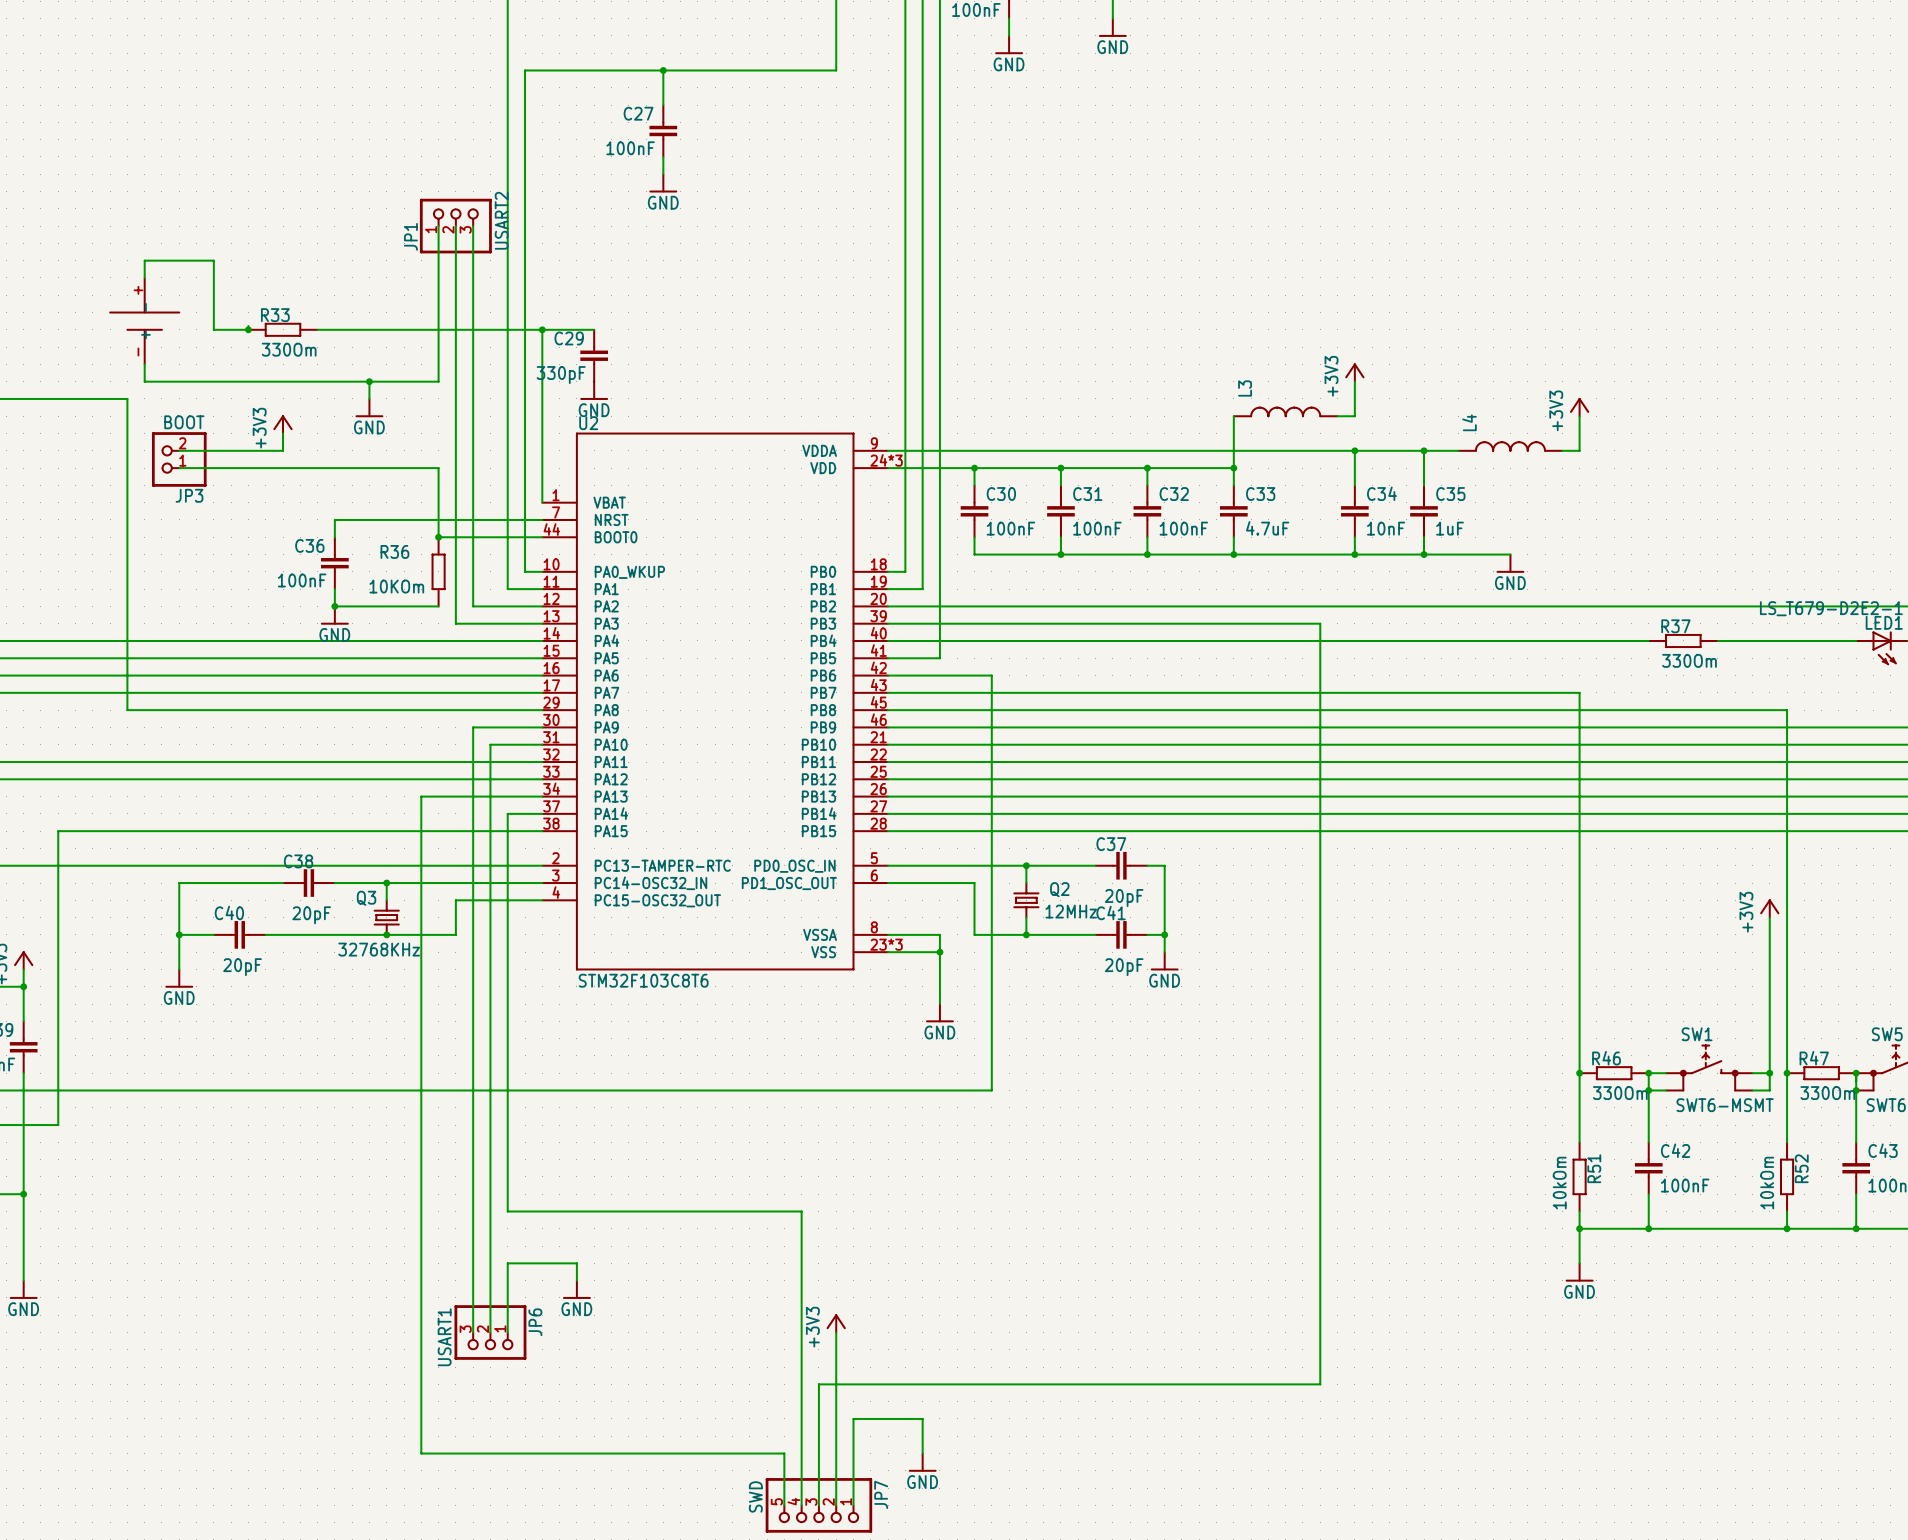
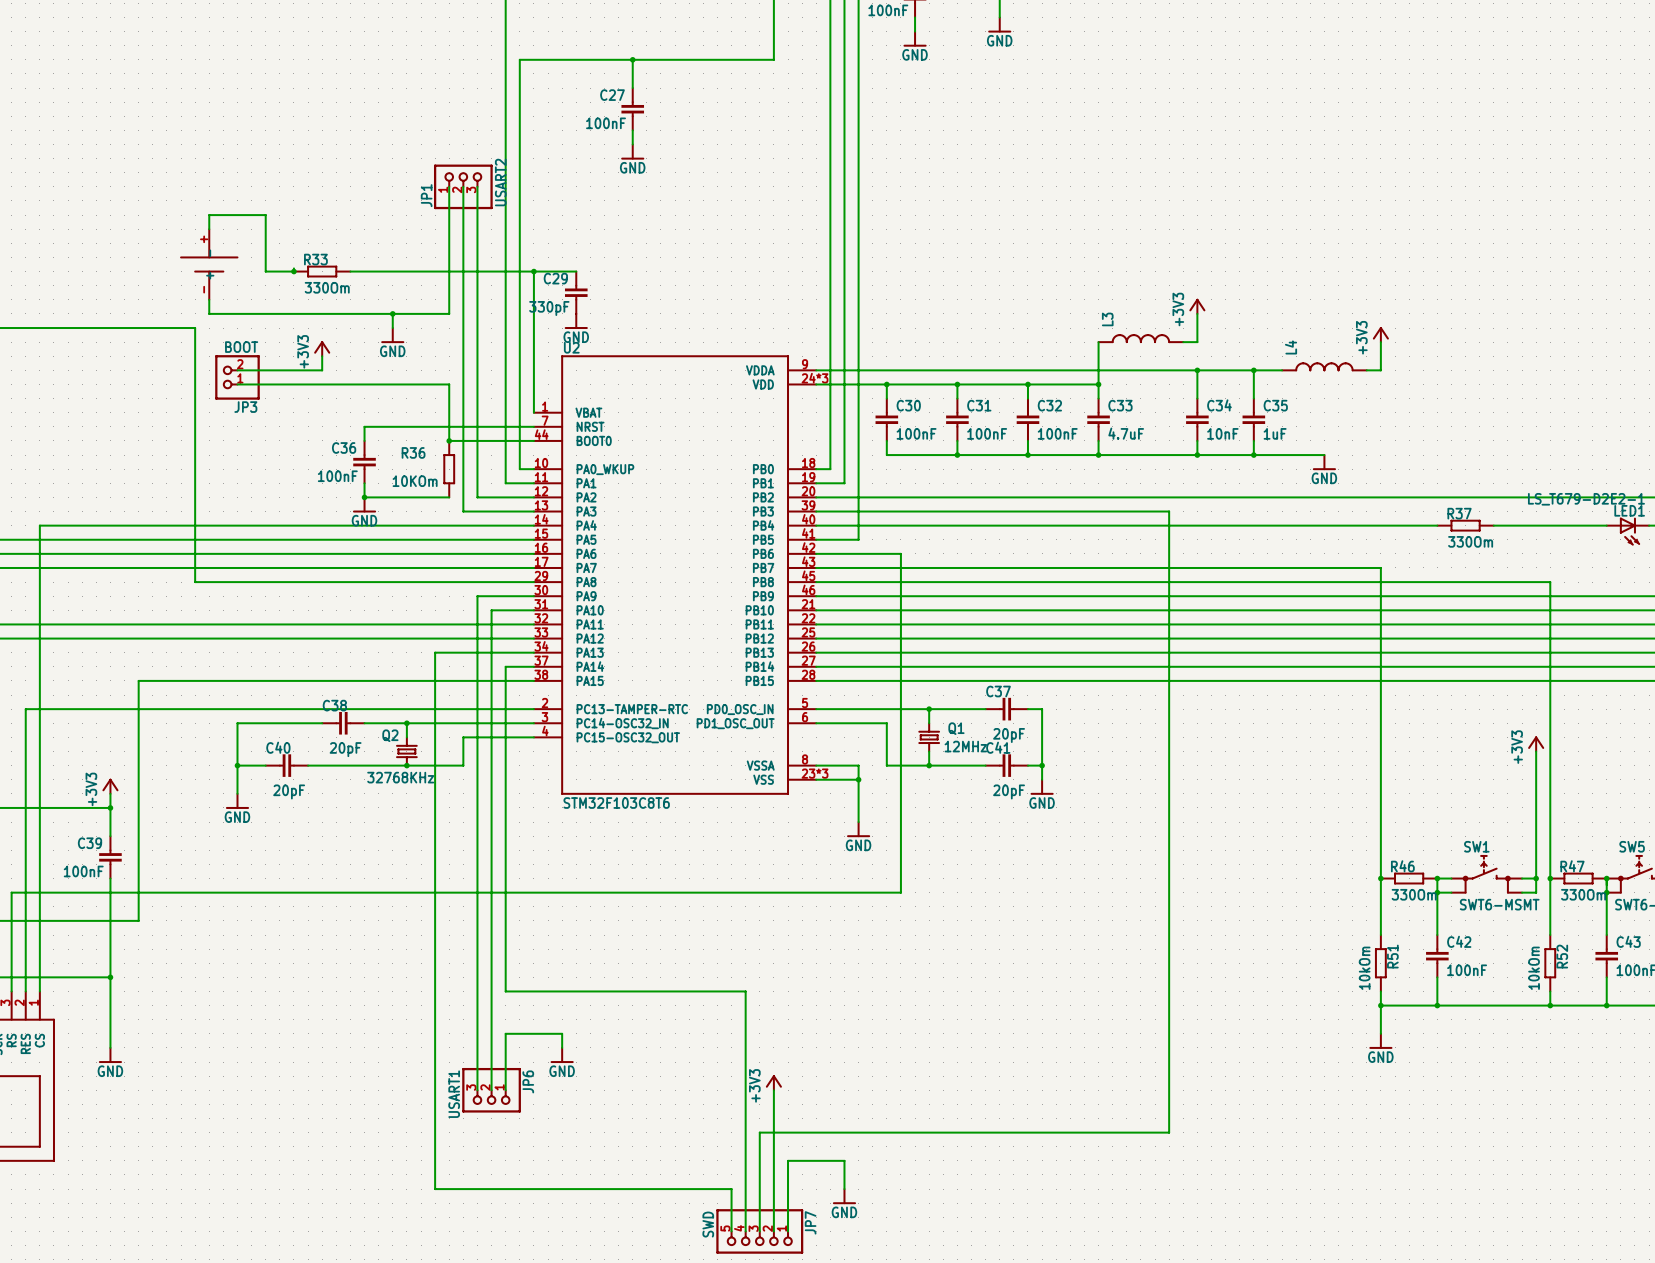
Q2 name: Q2 (1059, 889) -> Q1 (956, 728)
Q3 name: Q3 (366, 898) -> Q2 (390, 735)

